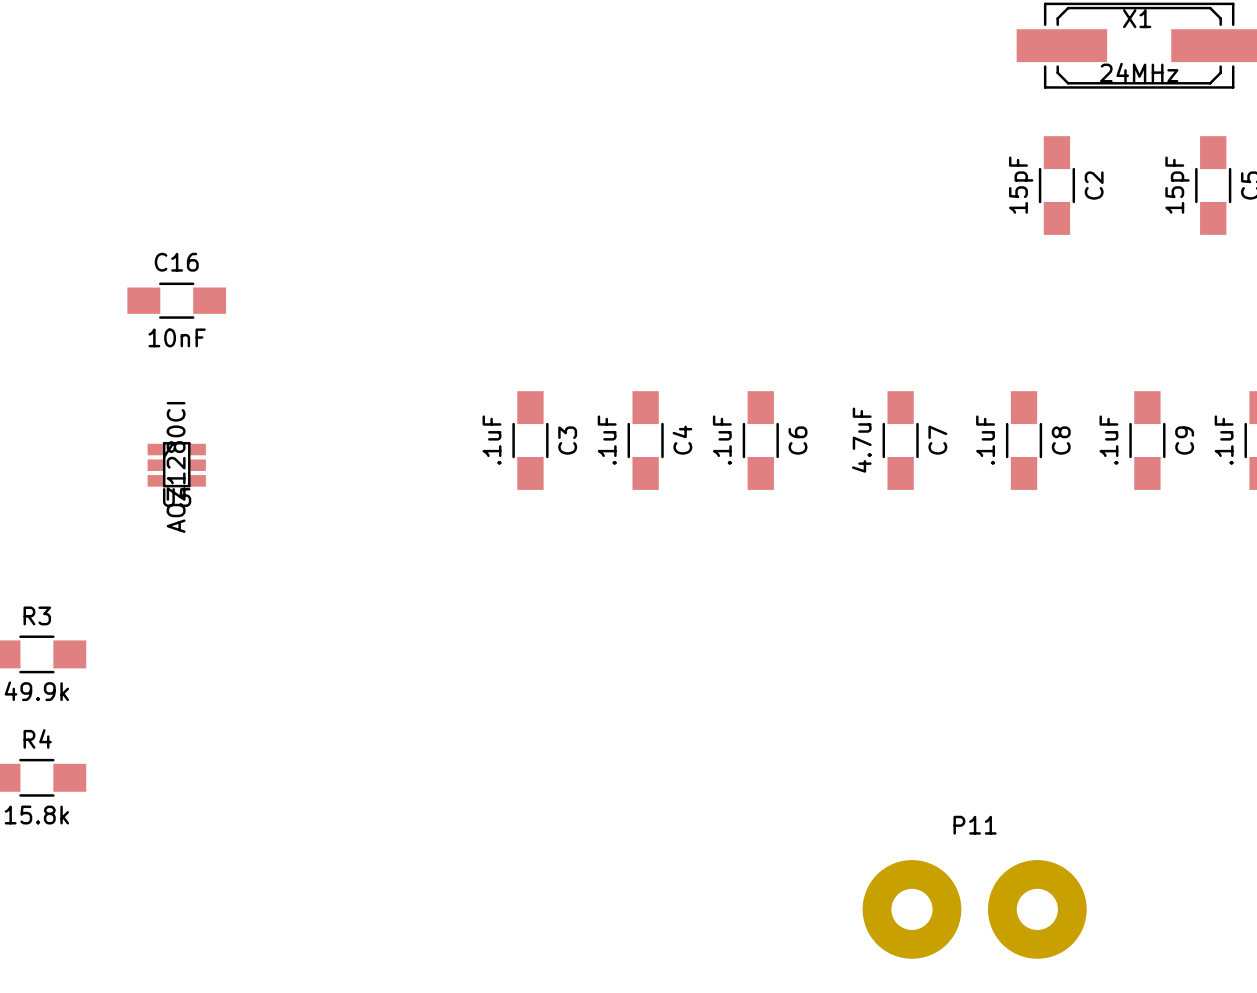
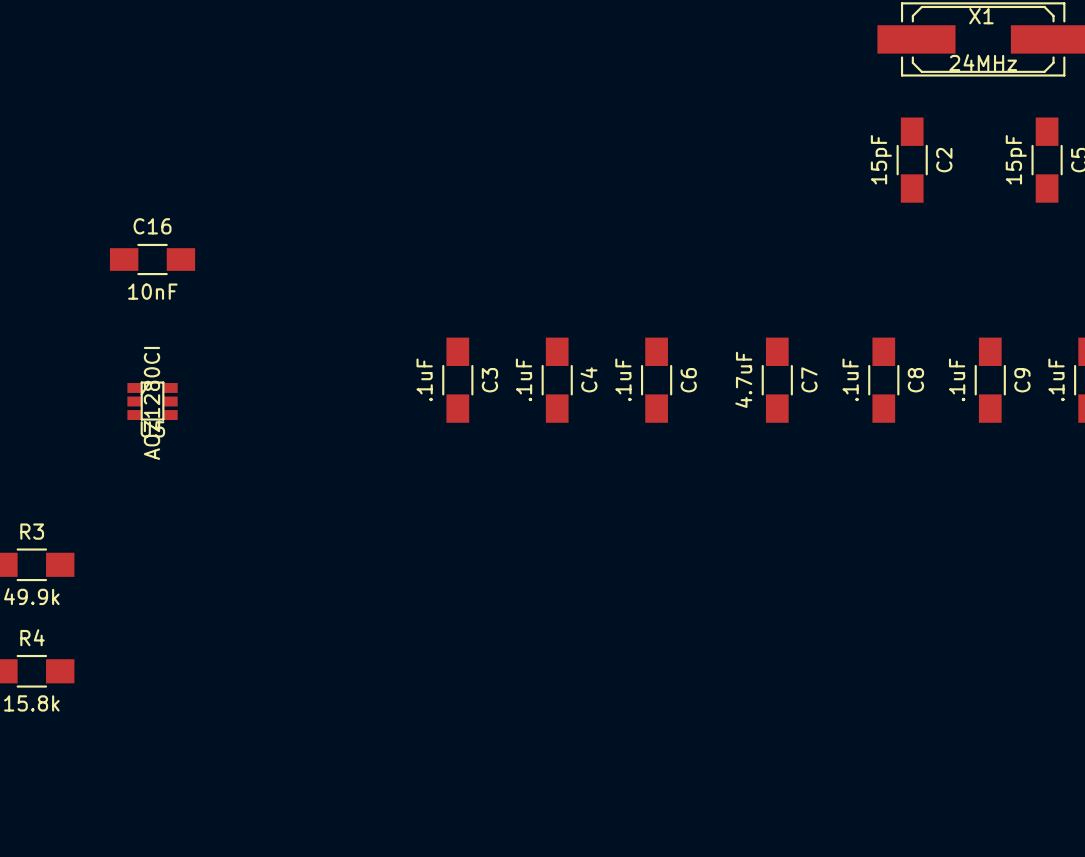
P11: (974, 909) -> none

